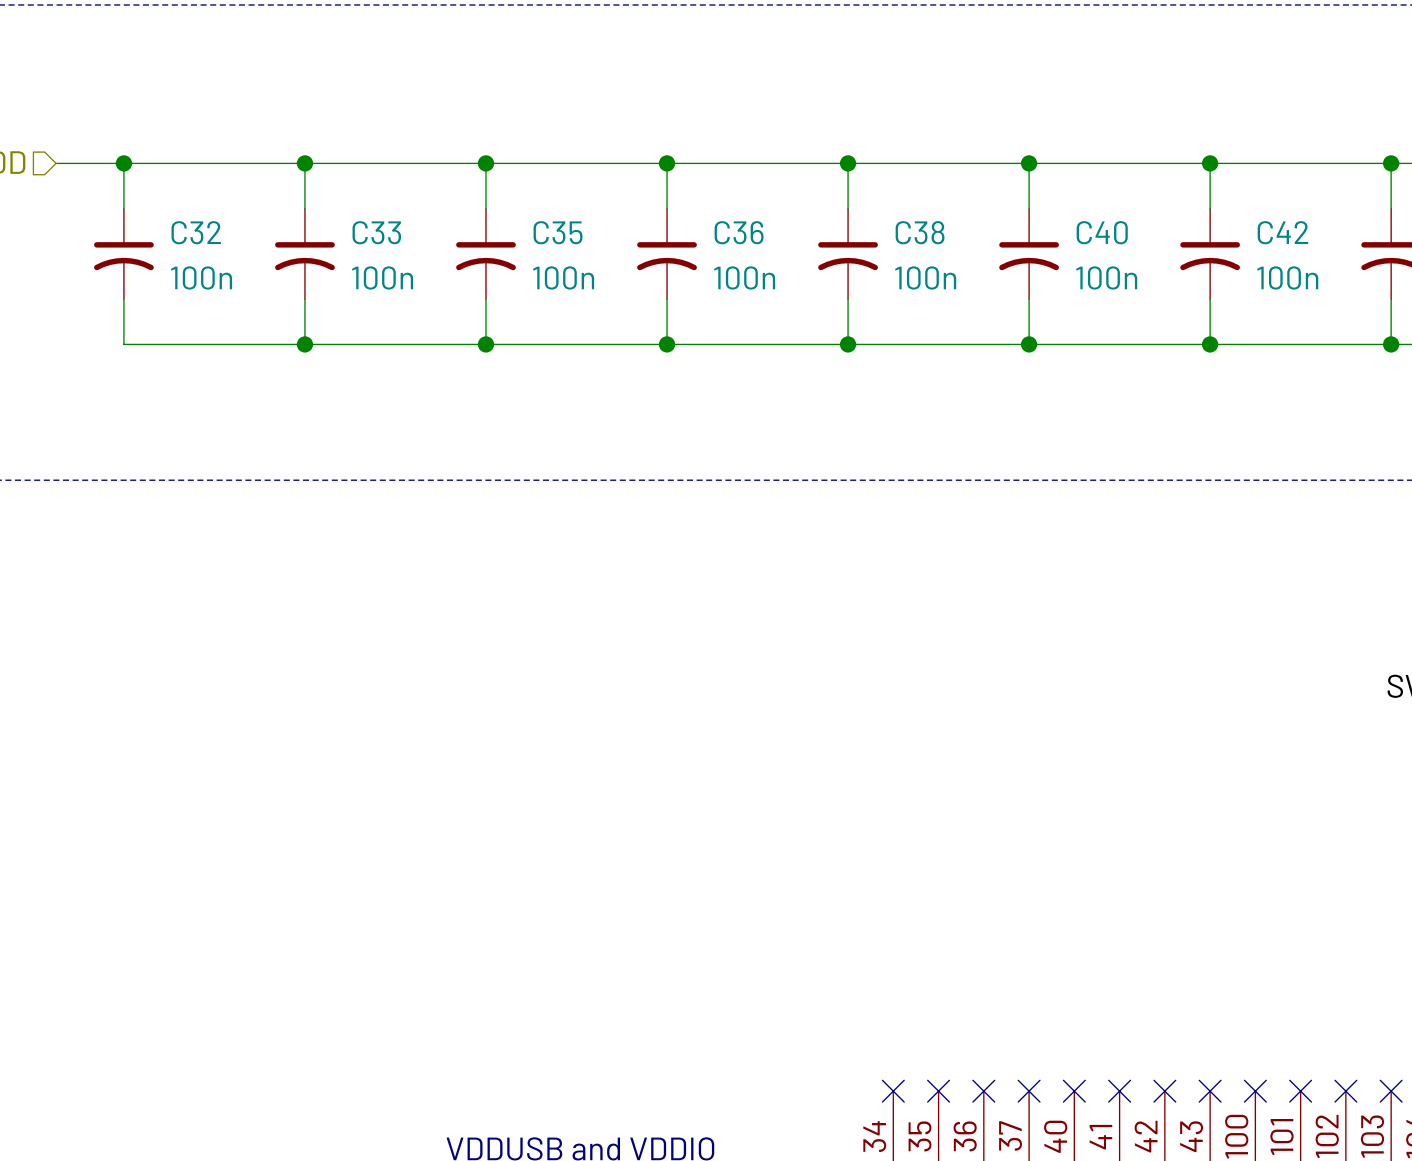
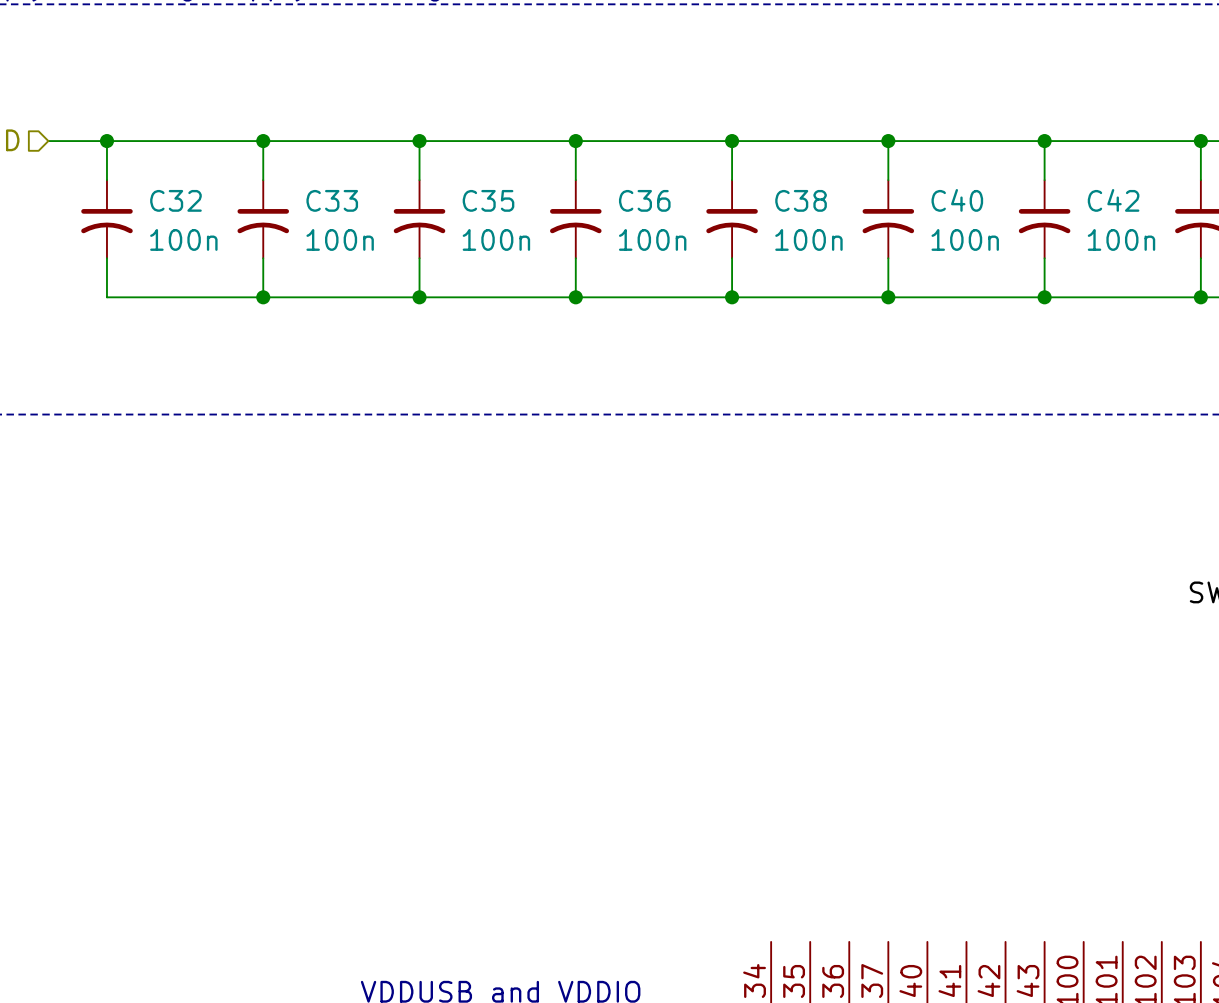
no-connect mark: (893, 1091) -> none
no-connect mark: (938, 1091) -> none
no-connect mark: (983, 1091) -> none
no-connect mark: (1029, 1091) -> none
no-connect mark: (1074, 1091) -> none
no-connect mark: (1119, 1091) -> none
no-connect mark: (1164, 1091) -> none
no-connect mark: (1210, 1091) -> none
no-connect mark: (1255, 1091) -> none
no-connect mark: (1300, 1091) -> none
no-connect mark: (1345, 1091) -> none
no-connect mark: (1391, 1091) -> none

